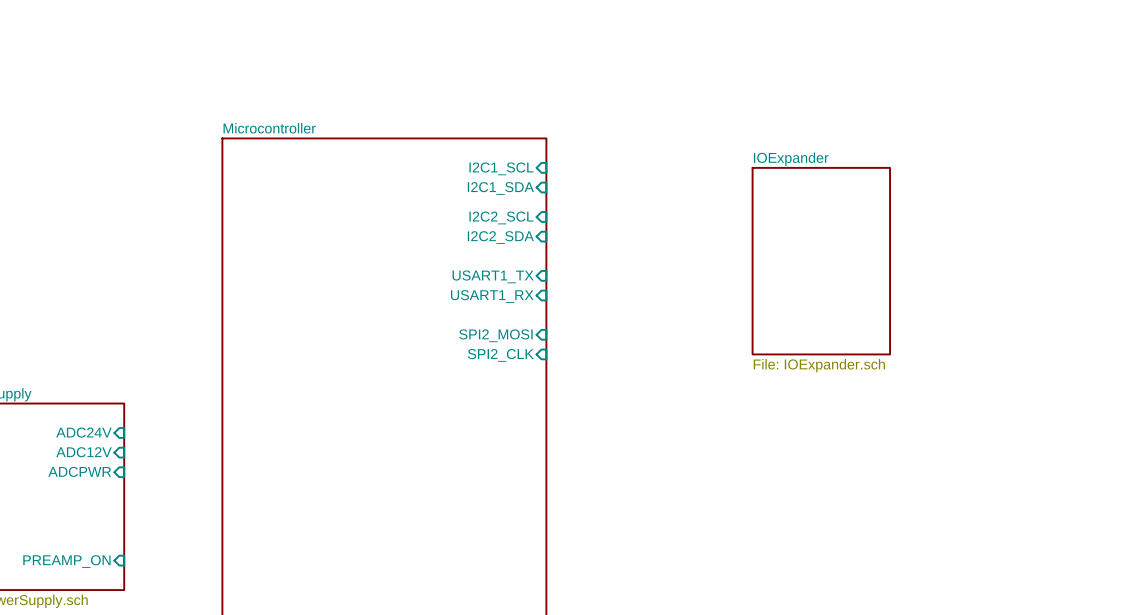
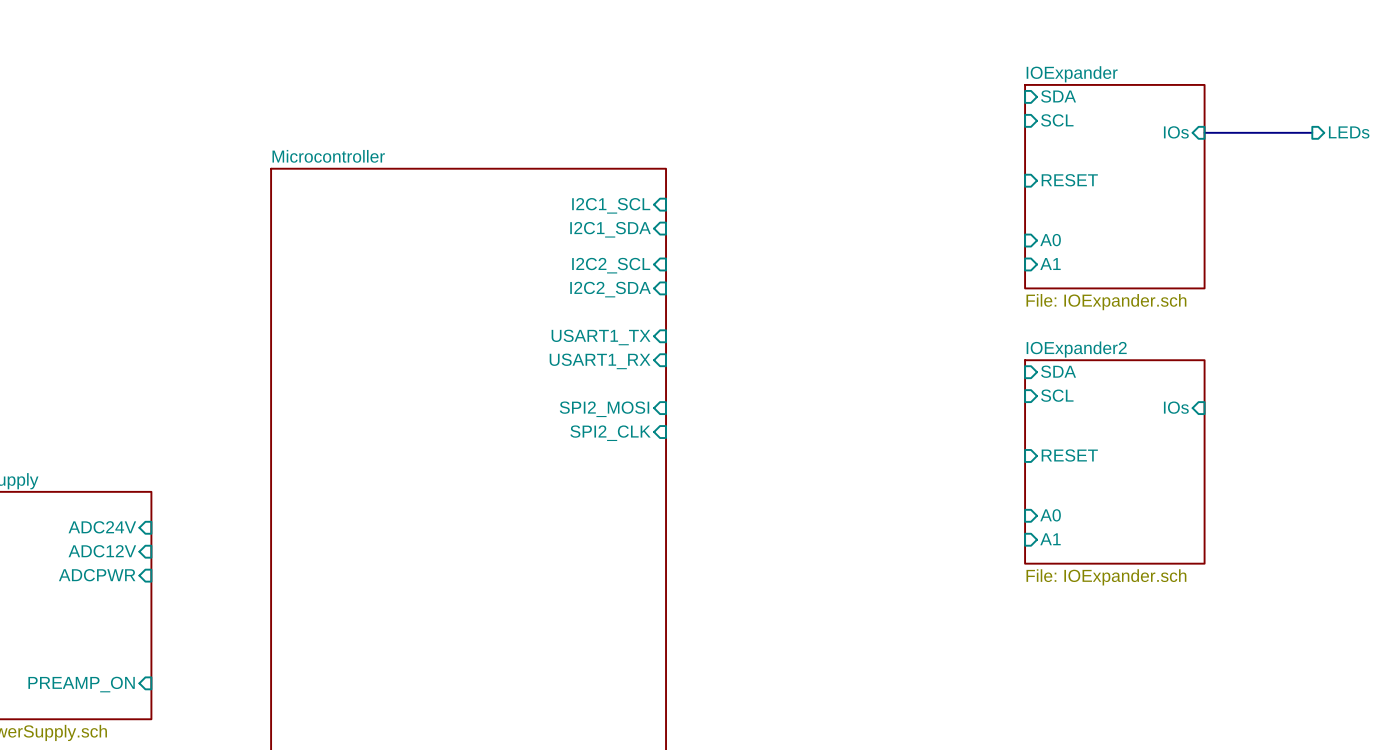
sheet pin: none -> SDA (1058, 96)
sheet pin: none -> SCL (1057, 120)
sheet pin: none -> IOs (1176, 132)
bus: none -> (1204, 132) (1312, 132)
sheet pin: none -> LEDs (1349, 132)
sheet pin: none -> RESET (1069, 180)
sheet IOExpander: none -> File: IOExpander.sch (1114, 186)
sheet pin: none -> A0 (1050, 240)
sheet pin: none -> A1 (1050, 264)
sheet IOExpander: File: IOExpander.sch (821, 261) -> none
sheet pin: none -> SDA (1058, 371)
sheet pin: none -> SCL (1057, 395)
sheet pin: none -> IOs (1176, 407)
sheet pin: none -> RESET (1069, 455)
sheet IOExpander2: none -> File: IOExpander.sch (1114, 461)
sheet pin: none -> A0 (1050, 515)
sheet pin: none -> A1 (1050, 539)

